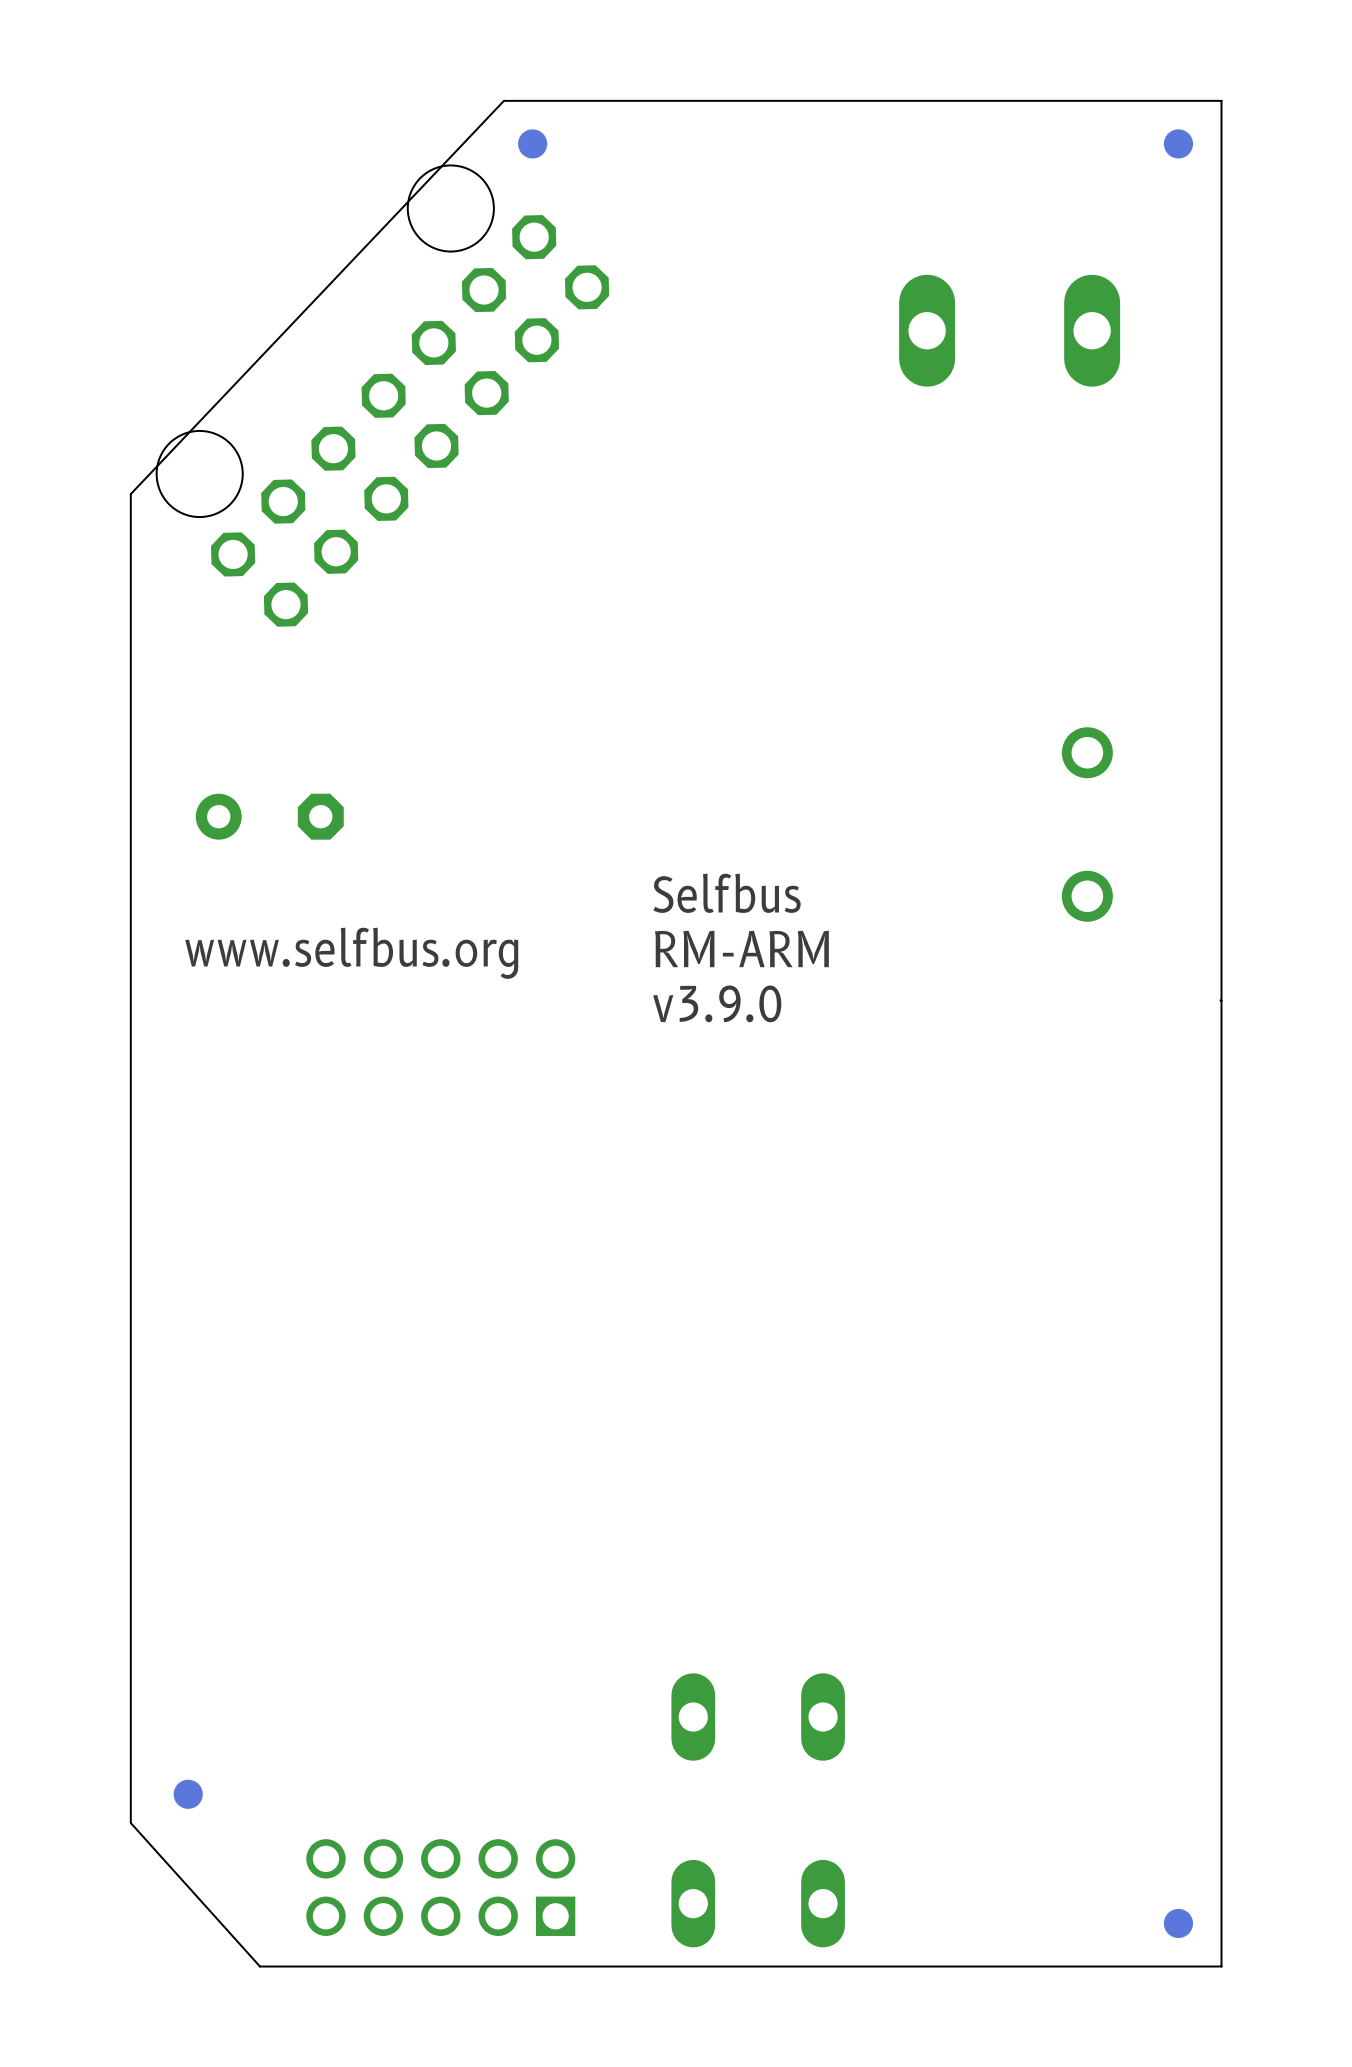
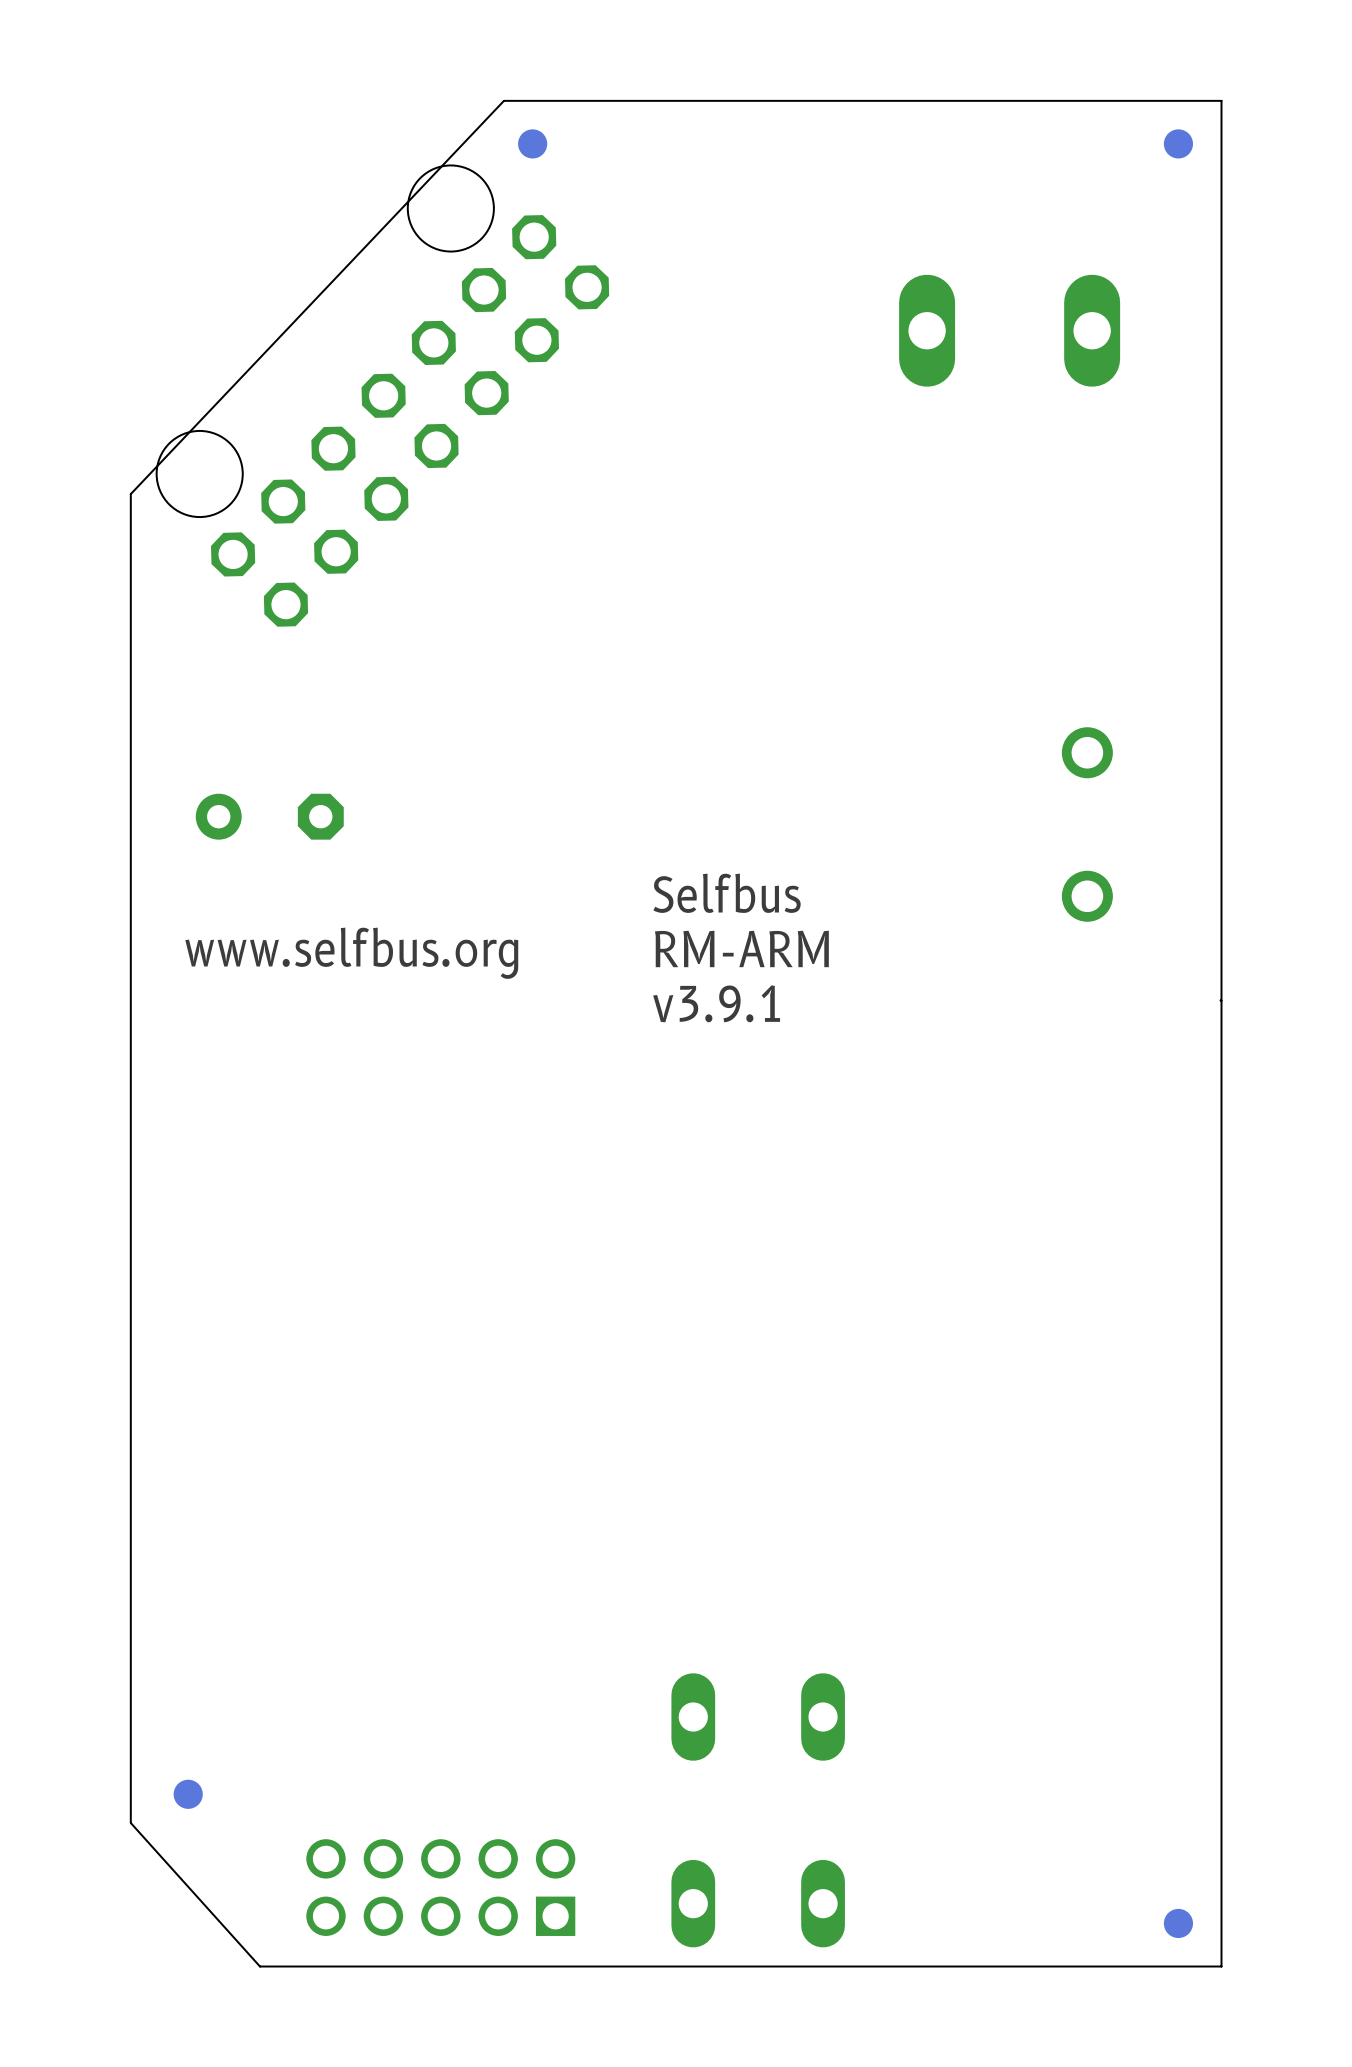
text: v3.9.0 (717, 1003) -> v3.9.1 (716, 1003)

